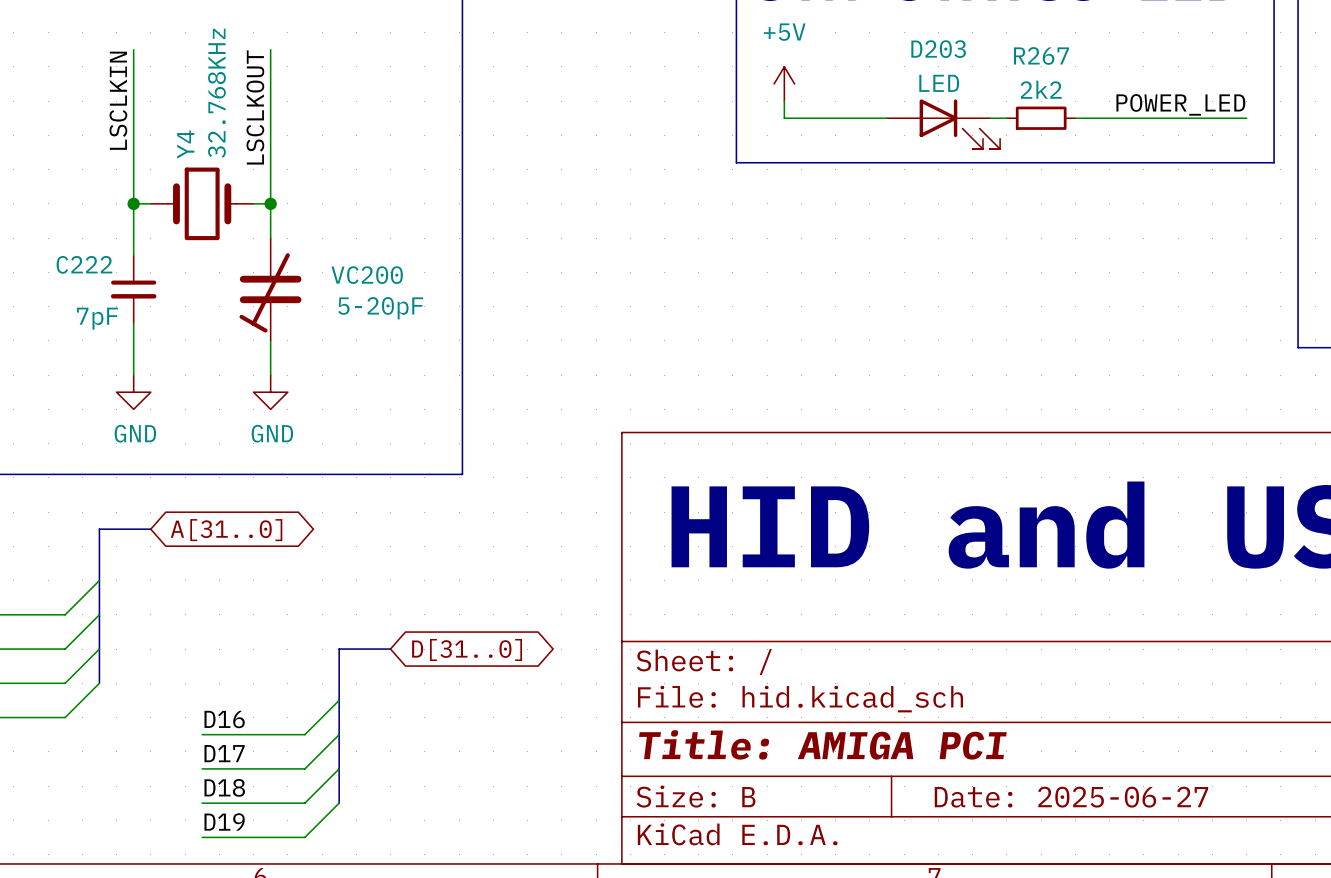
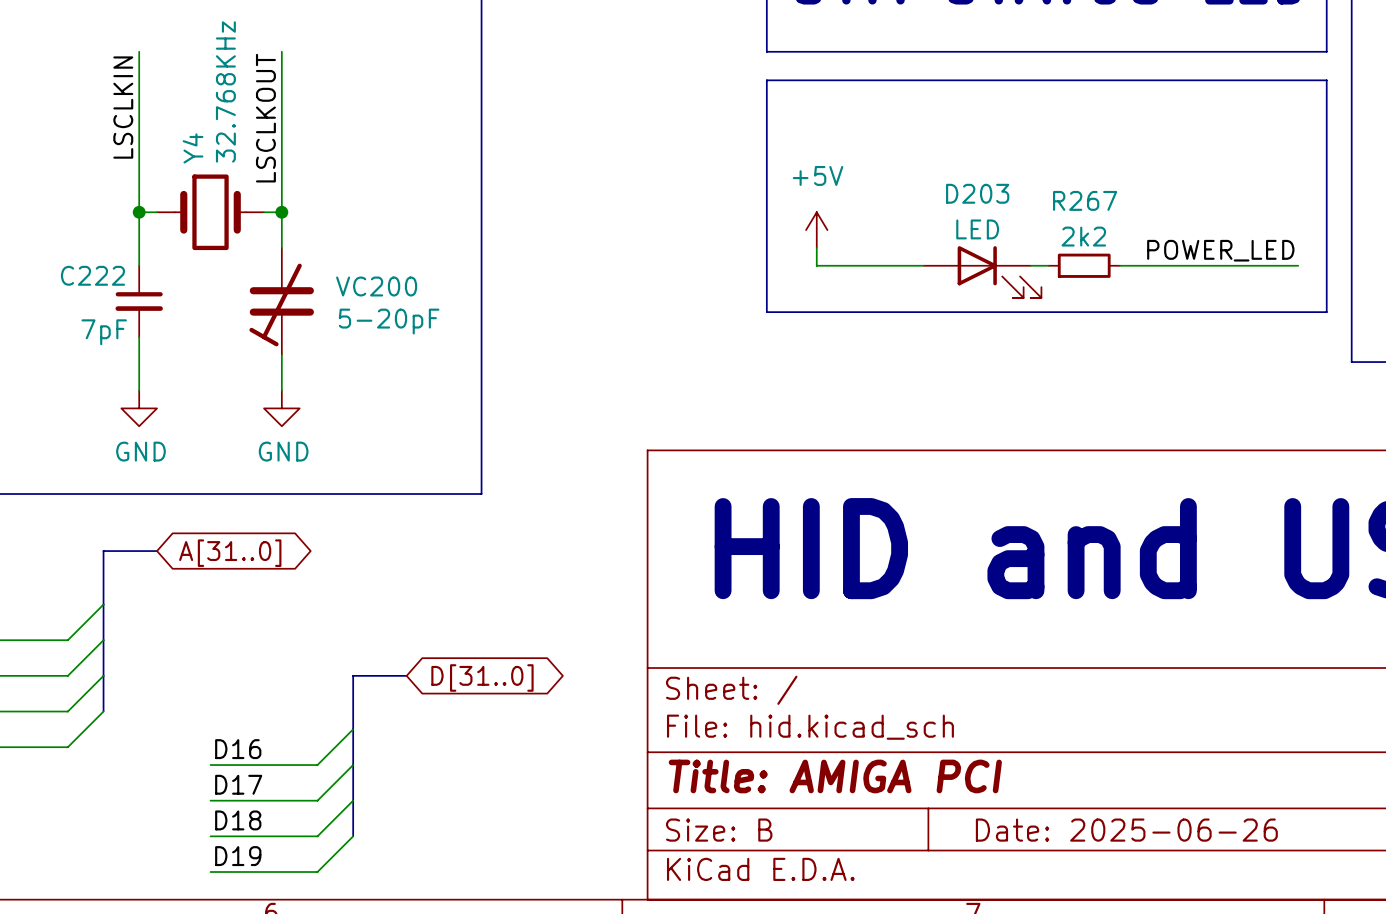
line: (736, 49) (736, 77) -> (766, 51) (1326, 51)
line: (1274, 49) (1274, 77) -> (766, 80) (1326, 80)
power symbol position: +5V (784, 83) -> +5V (816, 230)
wire: (784, 101) (784, 118) (887, 118) -> (816, 247) (816, 265) (923, 265)
label position: POWER_LED (1180, 104) -> POWER_LED (1220, 250)
wire: (989, 118) (1006, 118) -> (1030, 265) (1048, 265)
R267 position: (1041, 118) -> (1084, 265)
wire: (1075, 118) (1246, 118) -> (1119, 265) (1298, 265)
D203 position: (943, 124) -> (982, 272)
line: (736, 162) (1274, 162) -> (766, 169) (766, 312) (1326, 312) (1326, 169)
title block: Date: 2025-06-27 (1071, 797) -> Date: 2025-06-26 (1126, 830)

